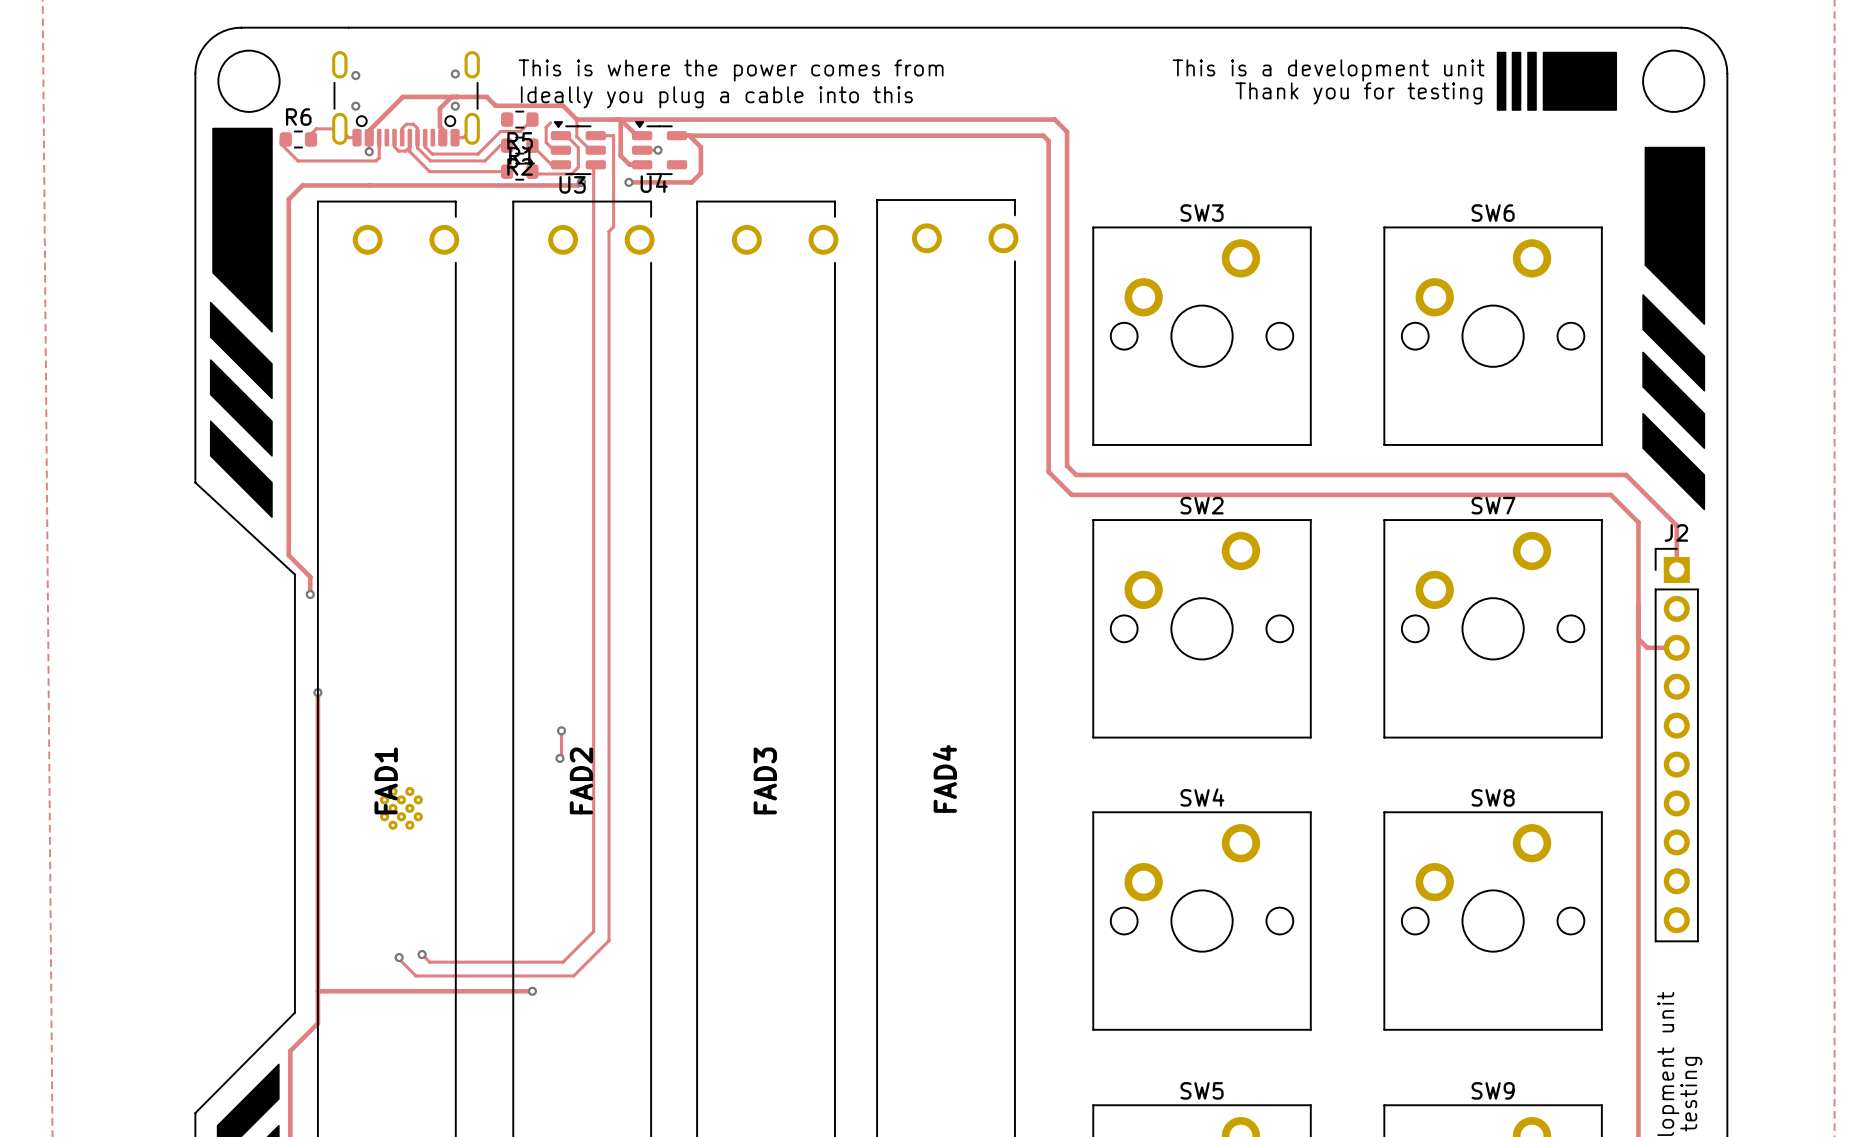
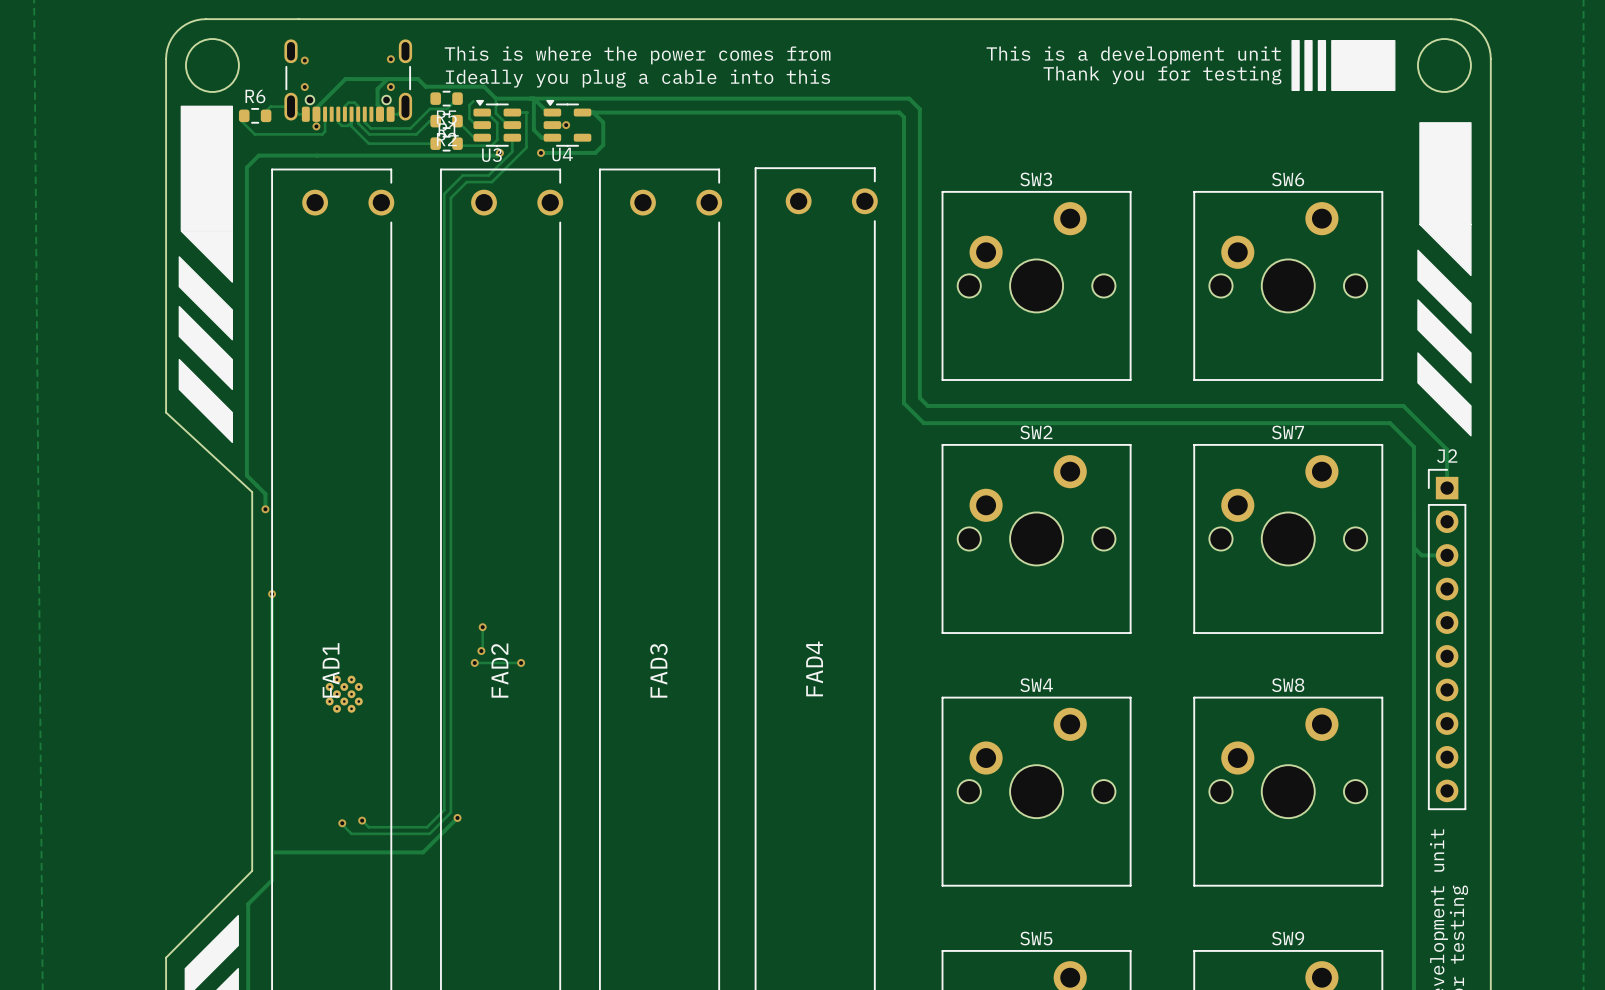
track: (613, 135) (613, 226) (609, 231) (609, 940) (573, 975) (415, 975) (409, 969) -> (526, 112) (526, 147) (491, 182) (466, 182) (450, 197) (450, 812) (429, 833) (351, 833)
track: (593, 166) (593, 931) (563, 962) (497, 962) -> (512, 137) (512, 151) (488, 175) (462, 175) (444, 194) (444, 810) (427, 827)
track: none -> (474, 662) (521, 662)
via: none -> (474, 662)
via: none -> (521, 662)
track: (492, 991) (533, 991) -> (423, 852) (457, 817) (458, 819)
via position: (532, 991) -> (457, 817)

